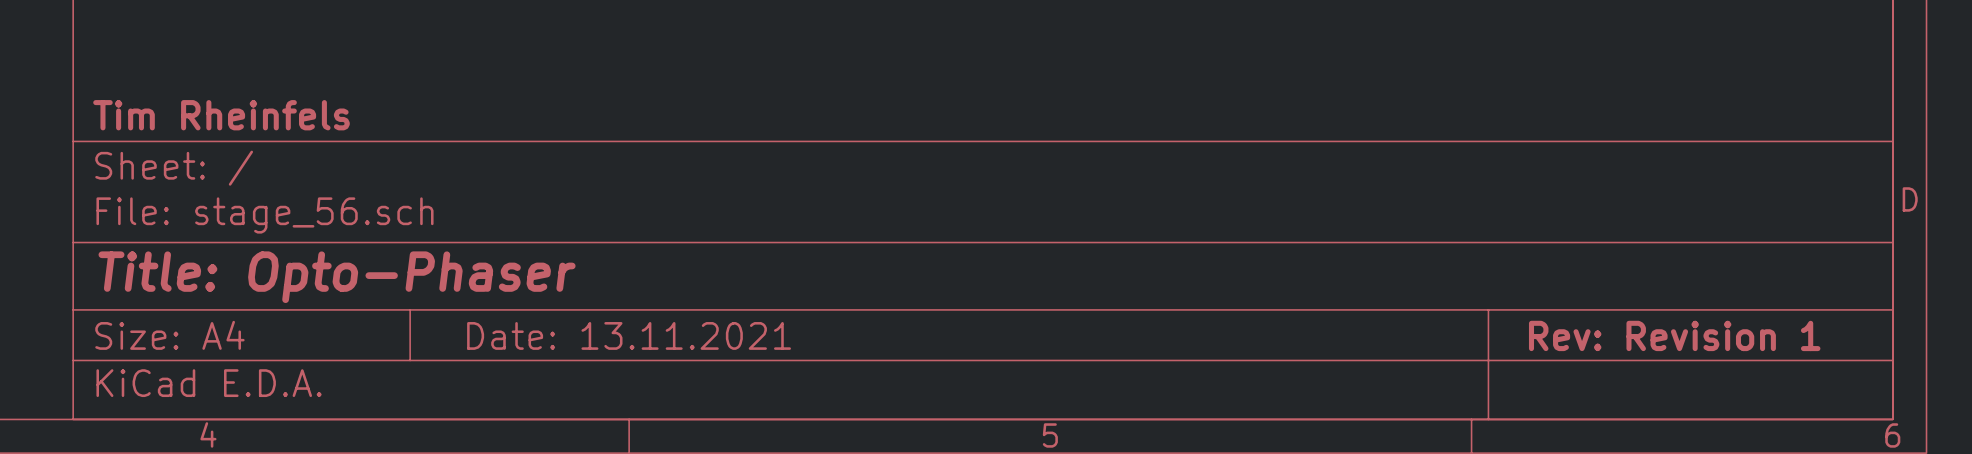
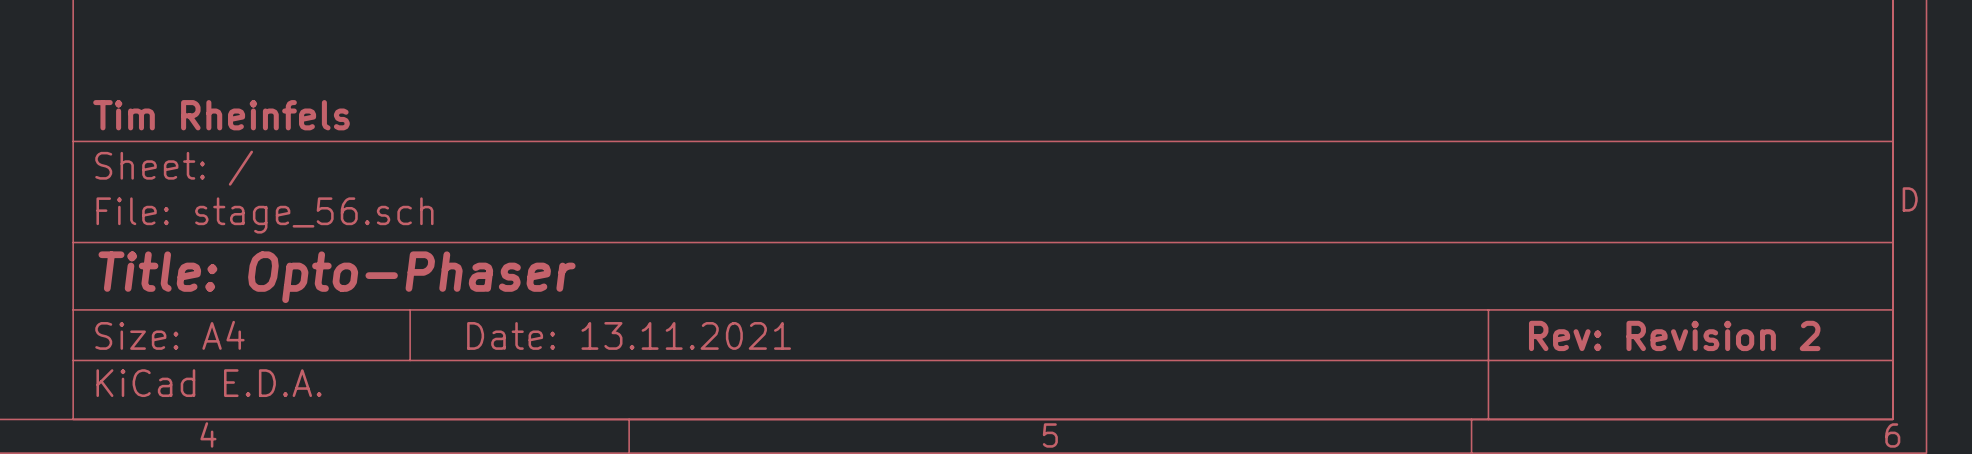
title block: Rev: Revision 1 (1674, 335) -> Rev: Revision 2 (1674, 335)

